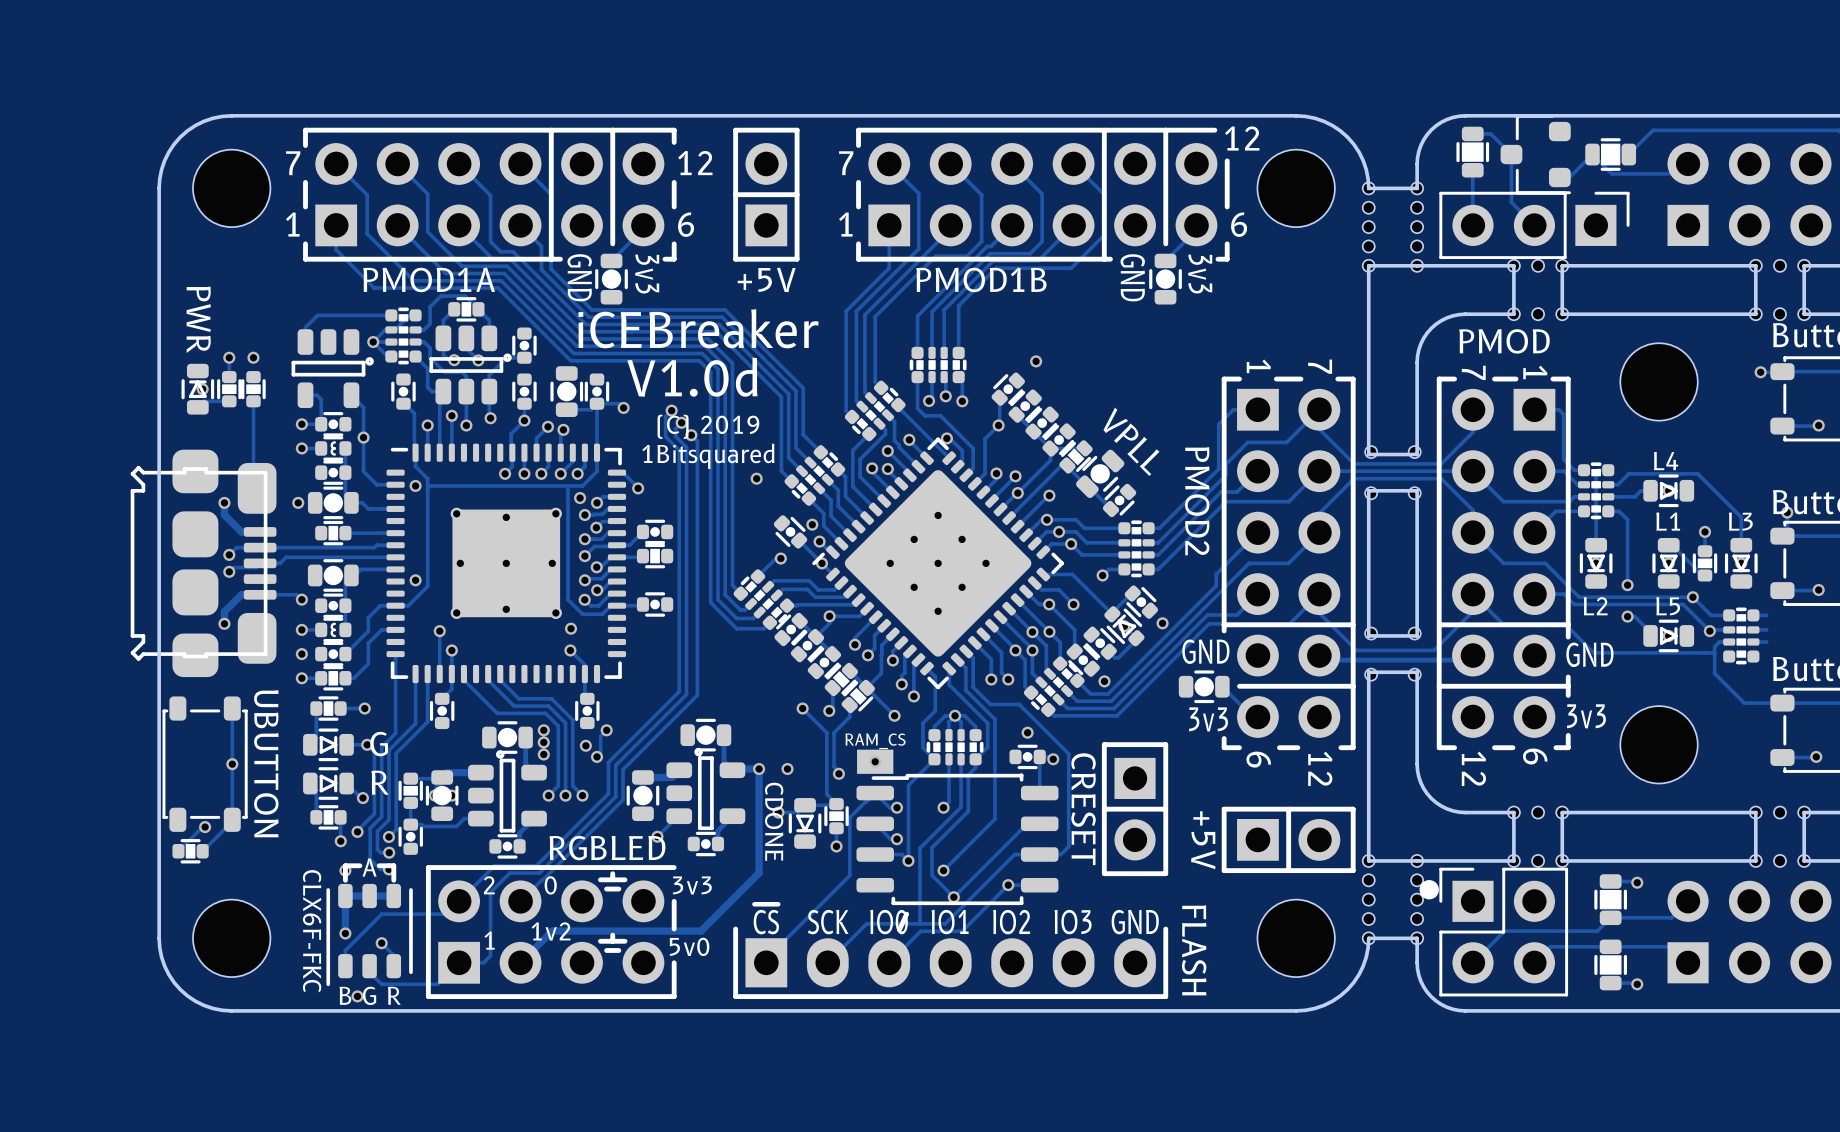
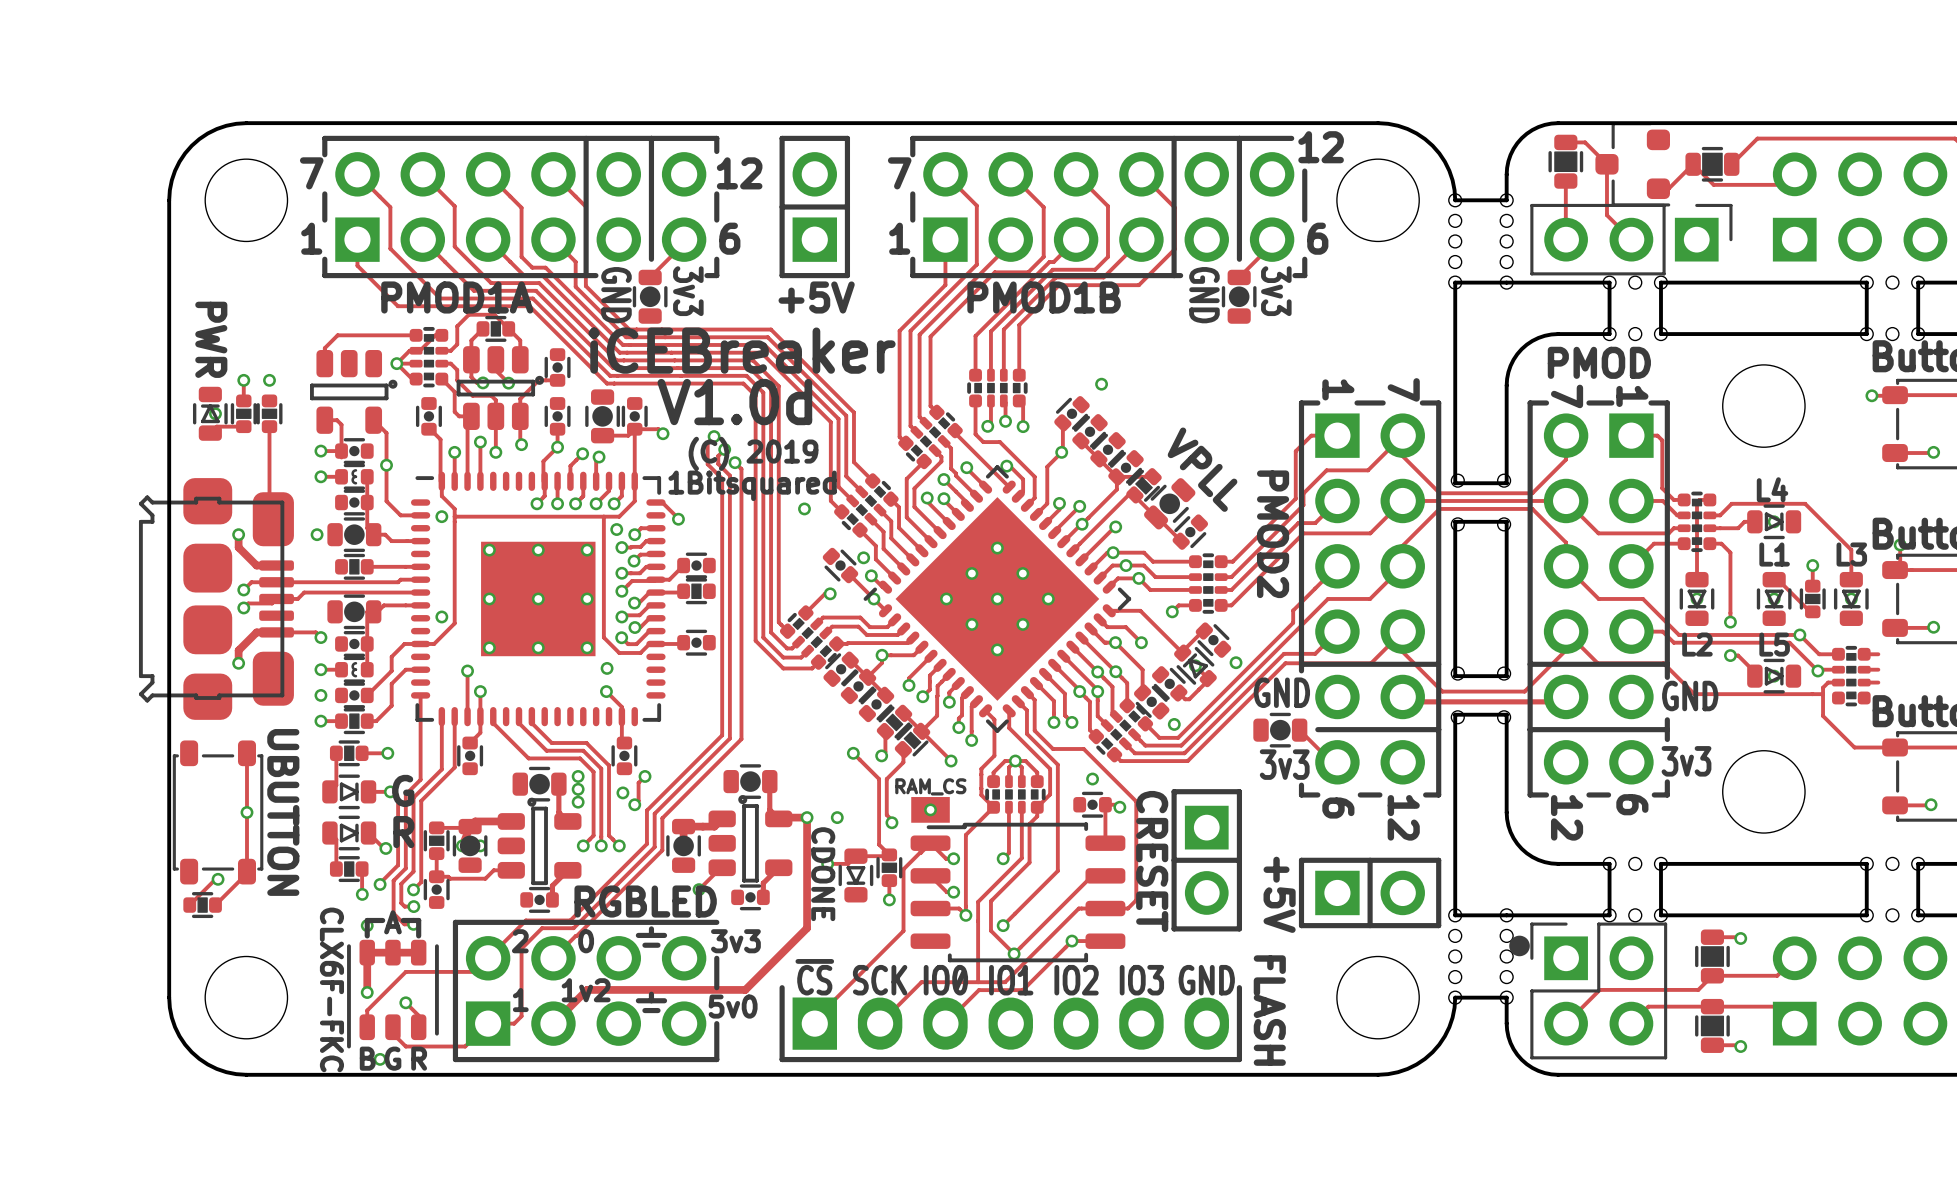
part footprint: [812, 437, 1064, 690] -> [863, 465, 1132, 733]
part footprint: [386, 443, 627, 684] -> [410, 471, 666, 727]

